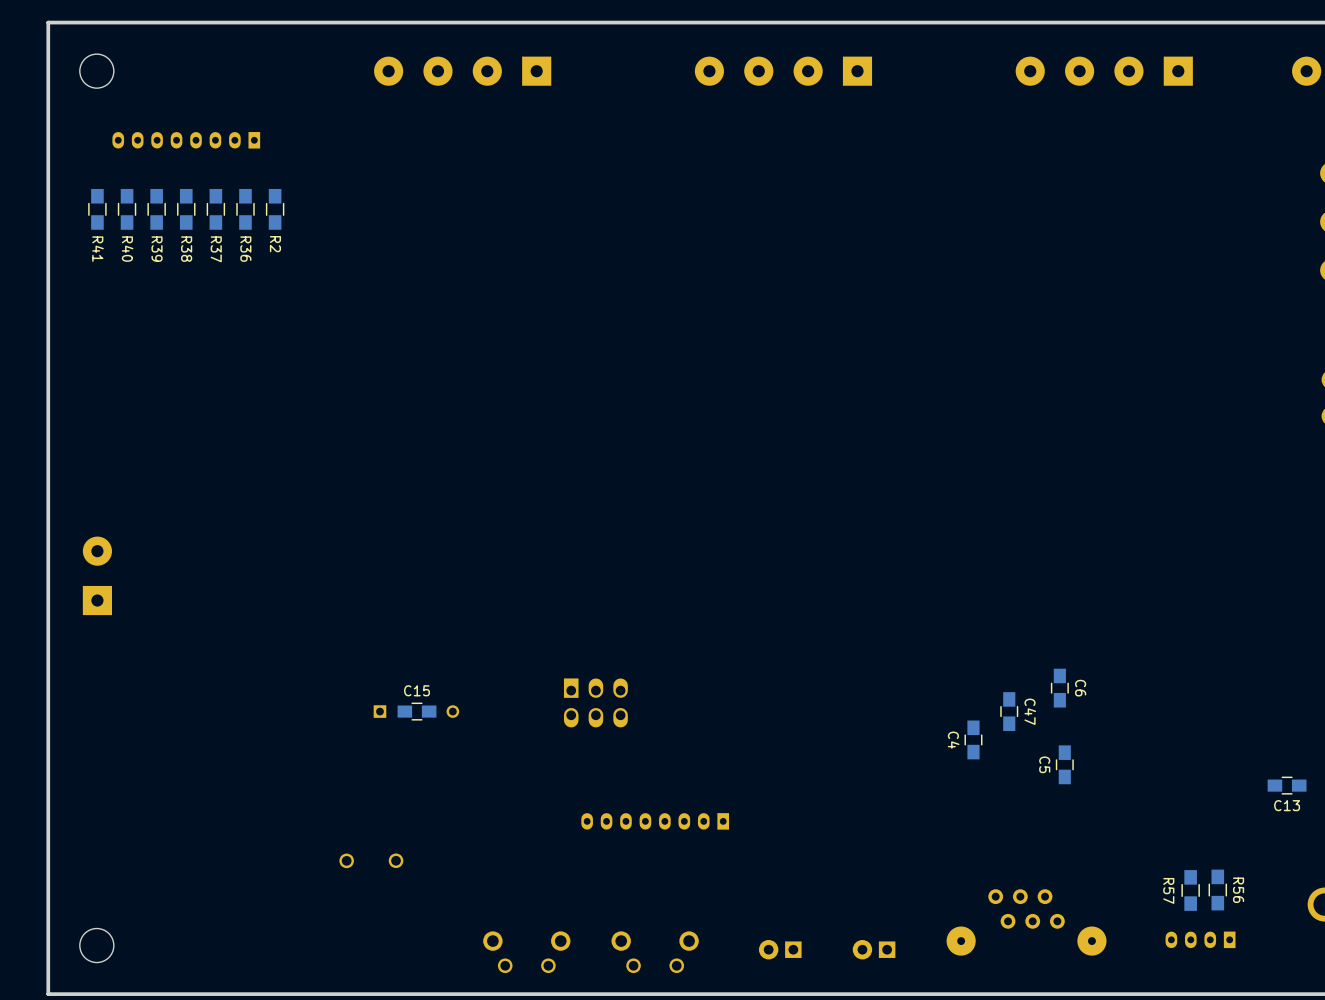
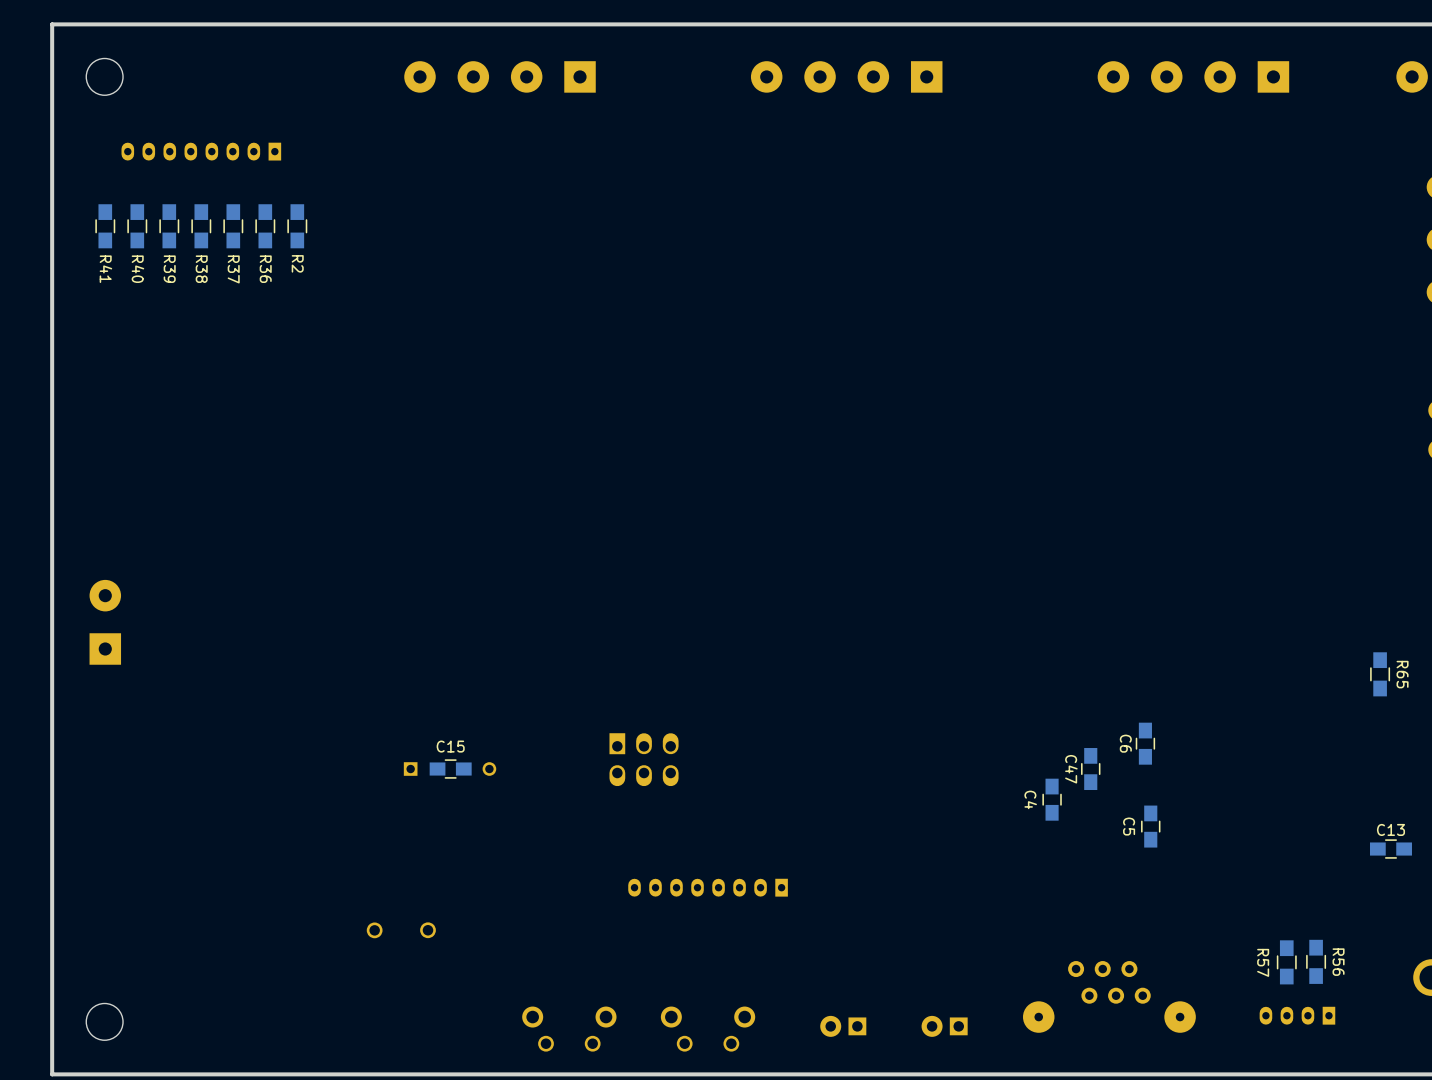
R65: none -> (1380, 674)
C6 name position: C6 (1080, 688) -> C6 (1125, 743)
C47 name position: C47 (1030, 711) -> C47 (1071, 769)
C13 name position: C13 (1287, 805) -> C13 (1390, 829)

